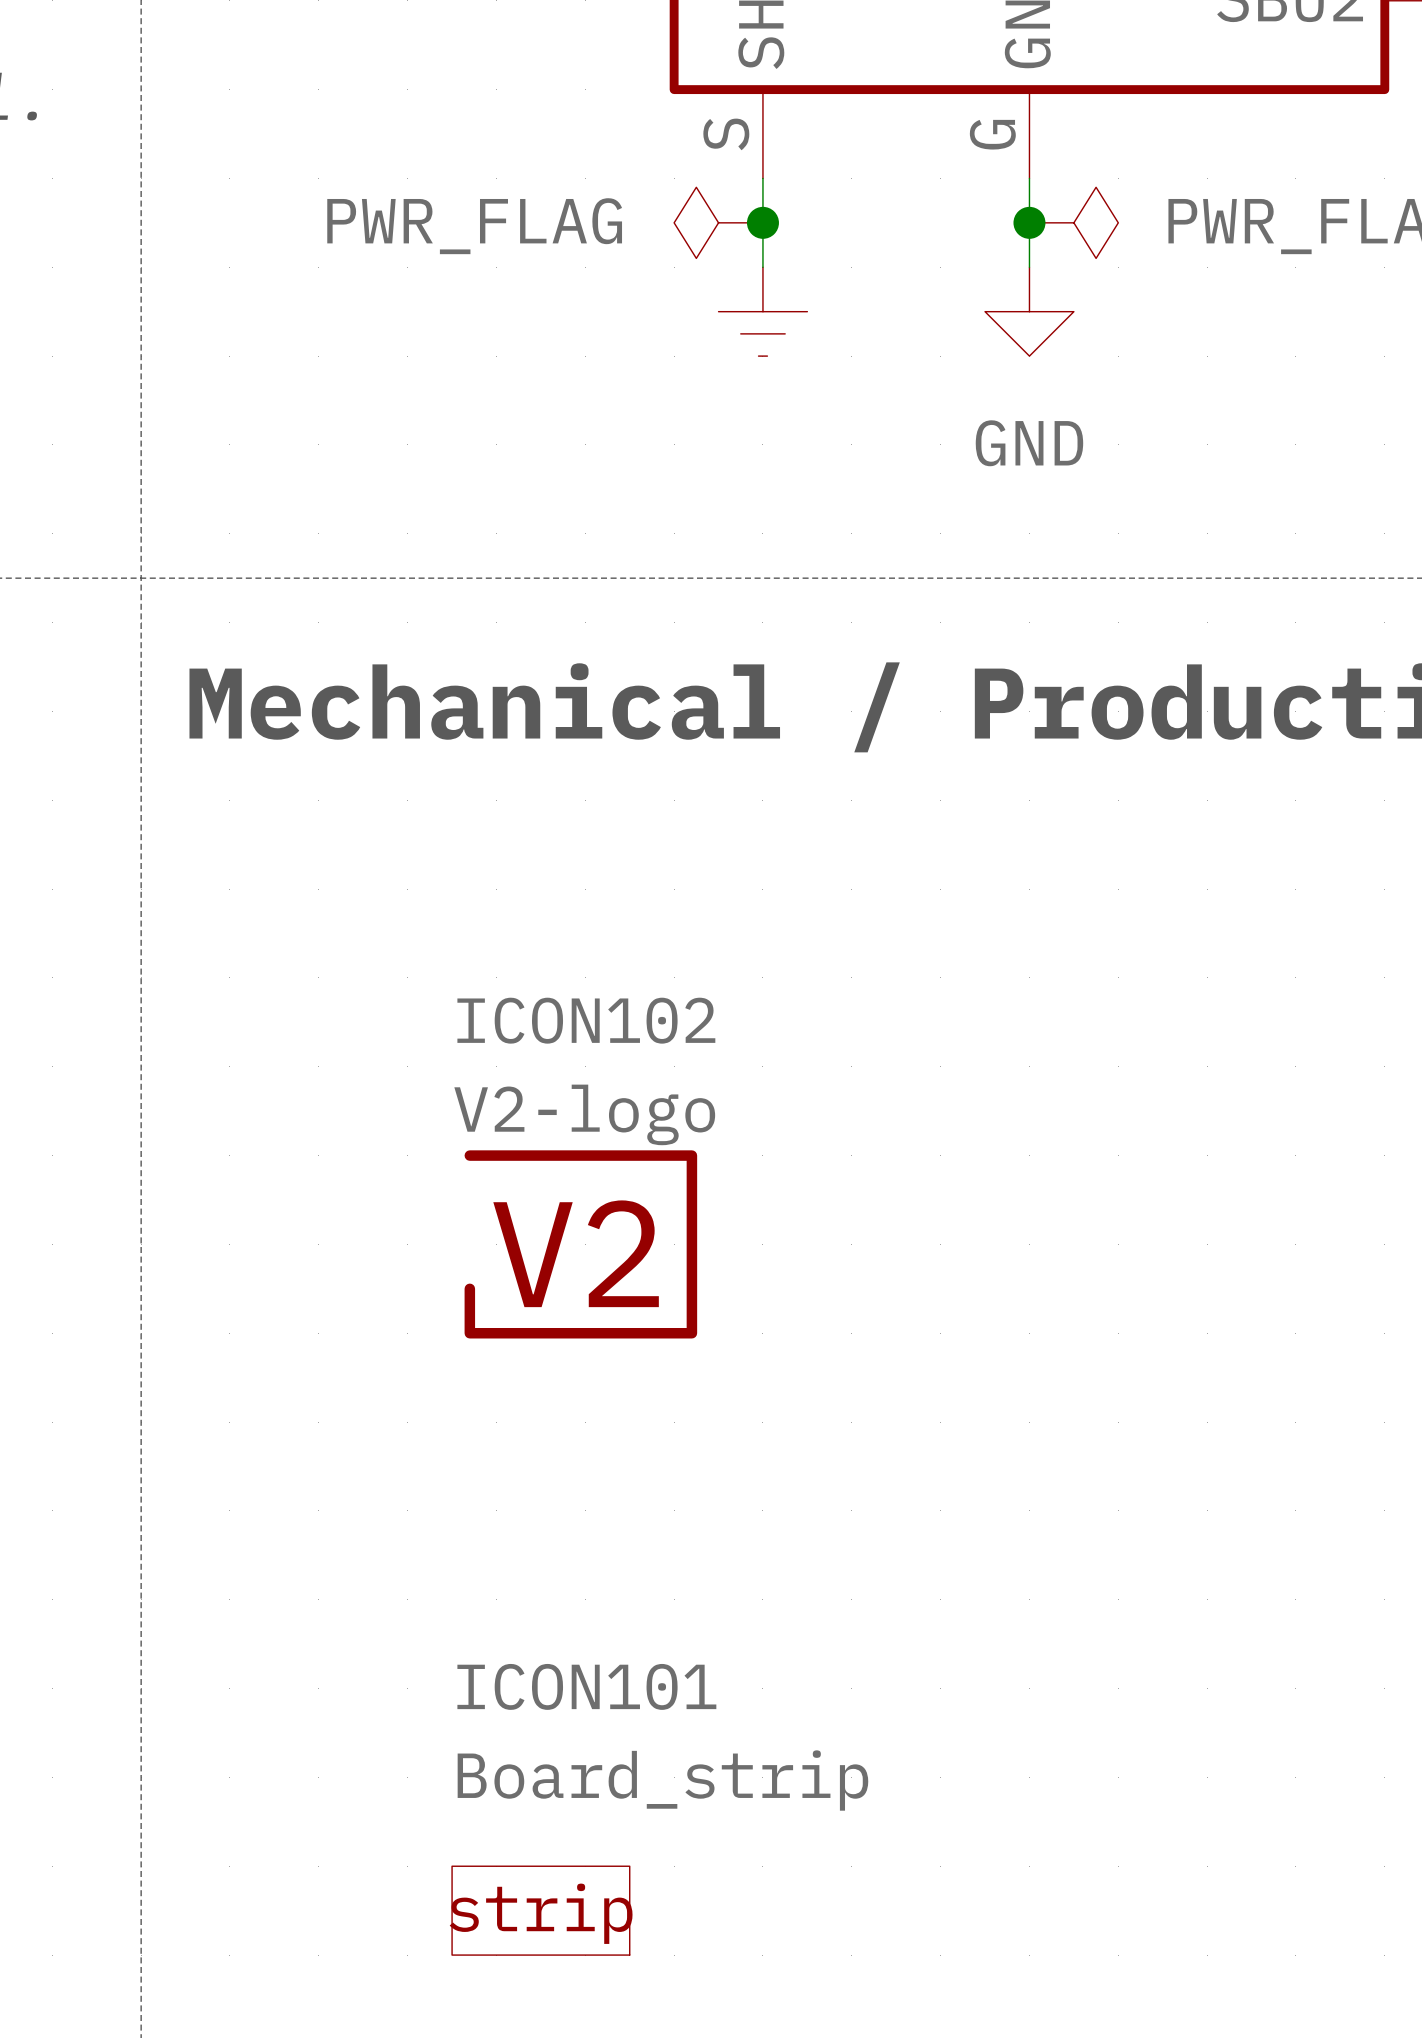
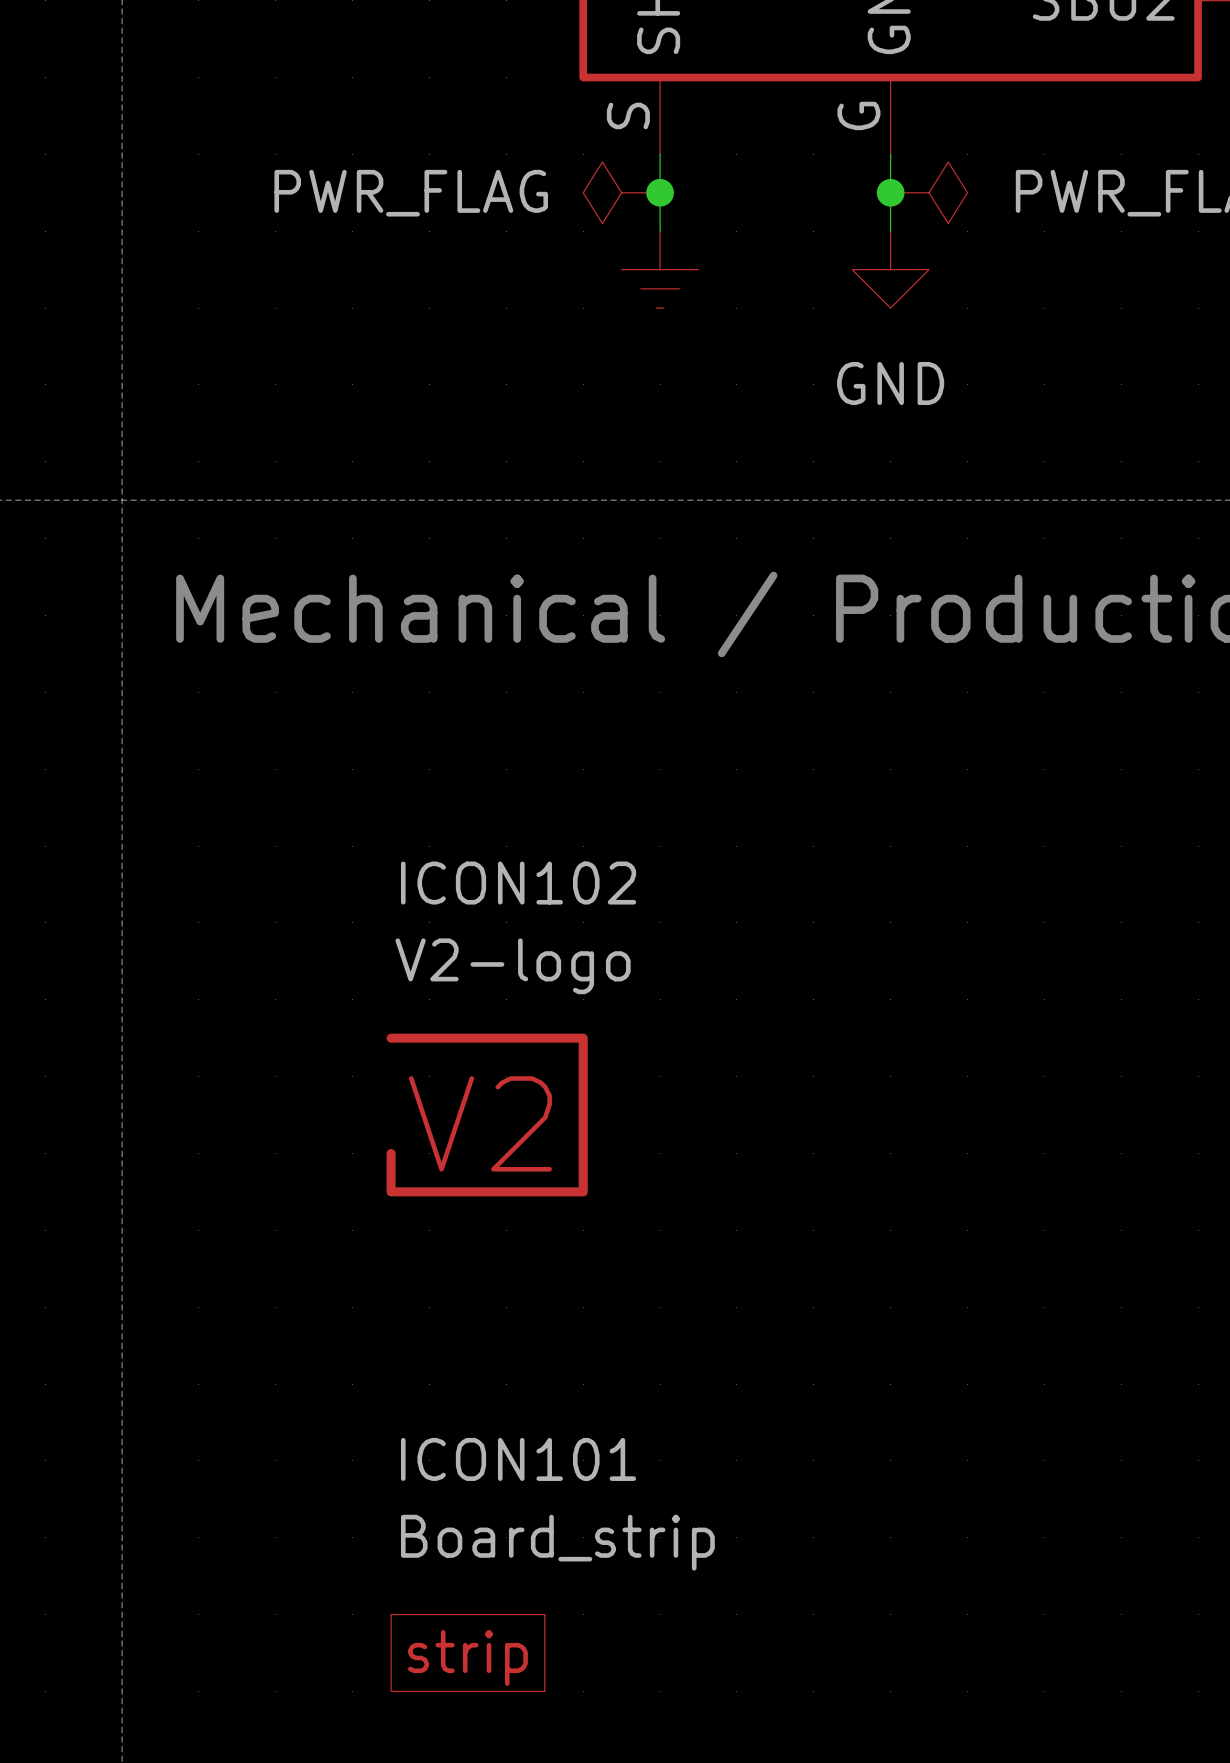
ICON102 position: (580, 1244) -> (487, 1115)

